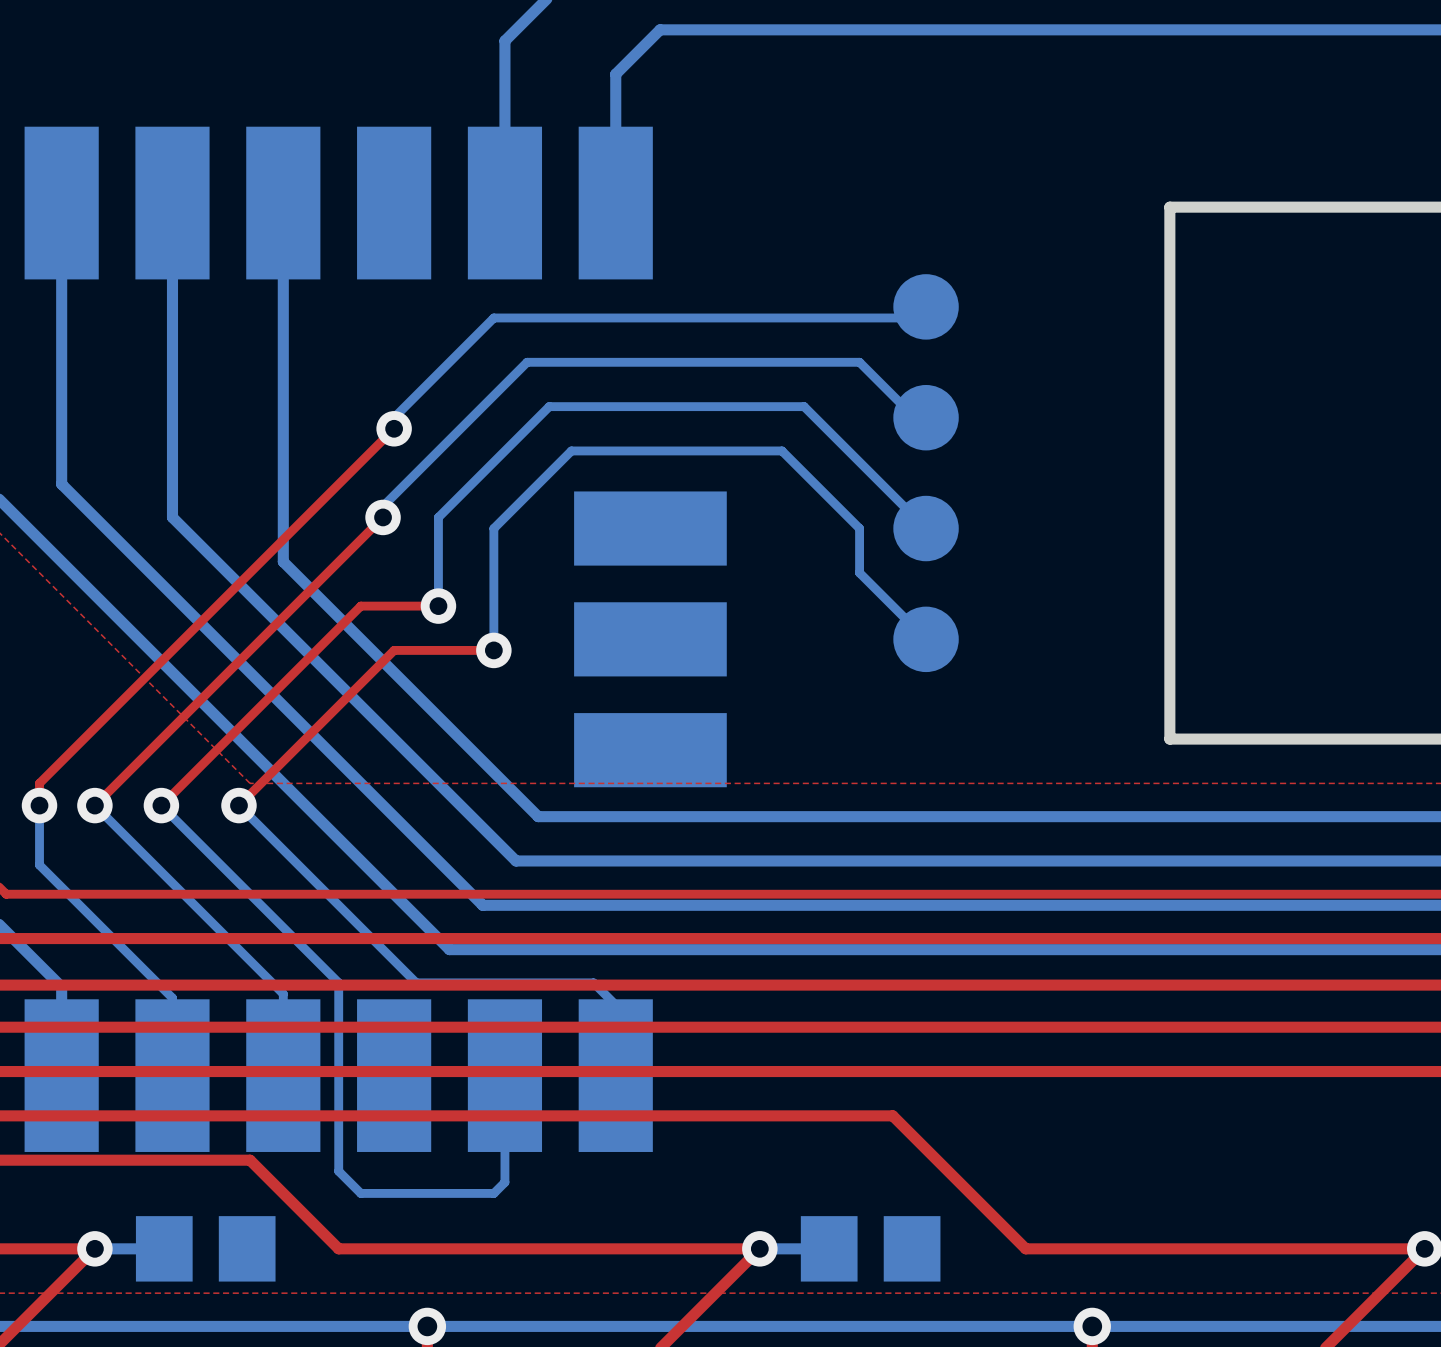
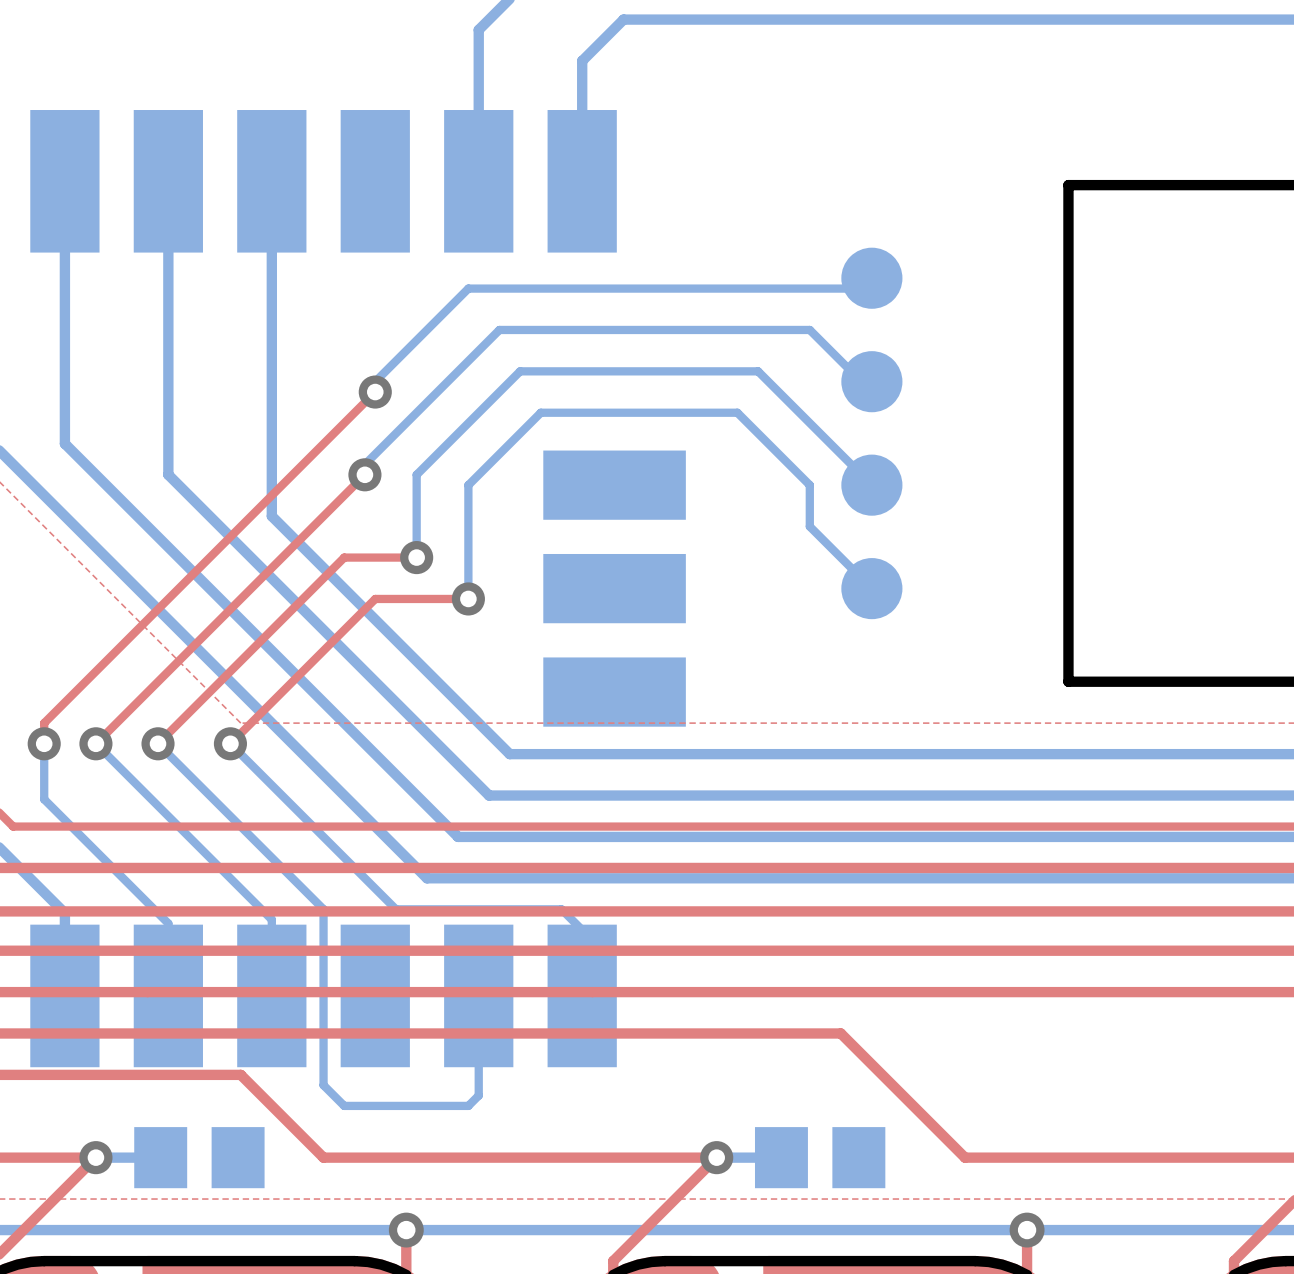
board edge: (1169, 207) (1169, 739) -> (1099, 185) (1068, 185) (1068, 681) (1099, 681)

